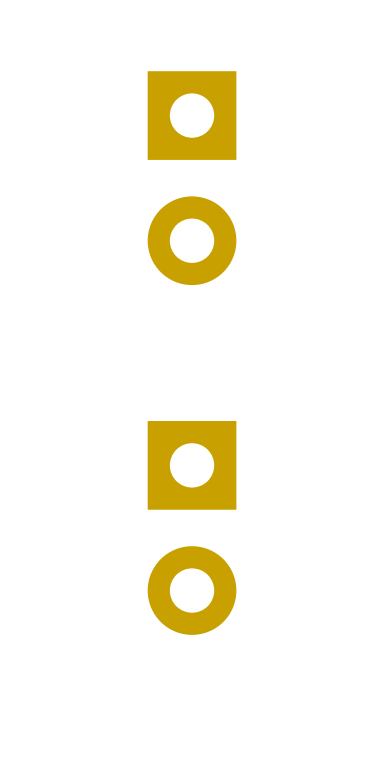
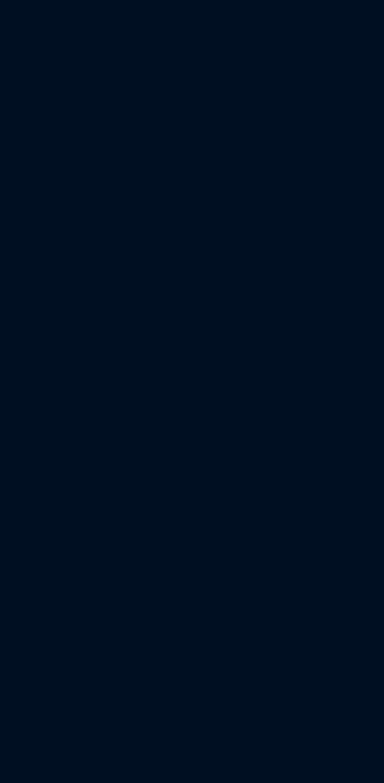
part: (192, 178) -> none
part: (192, 527) -> none

